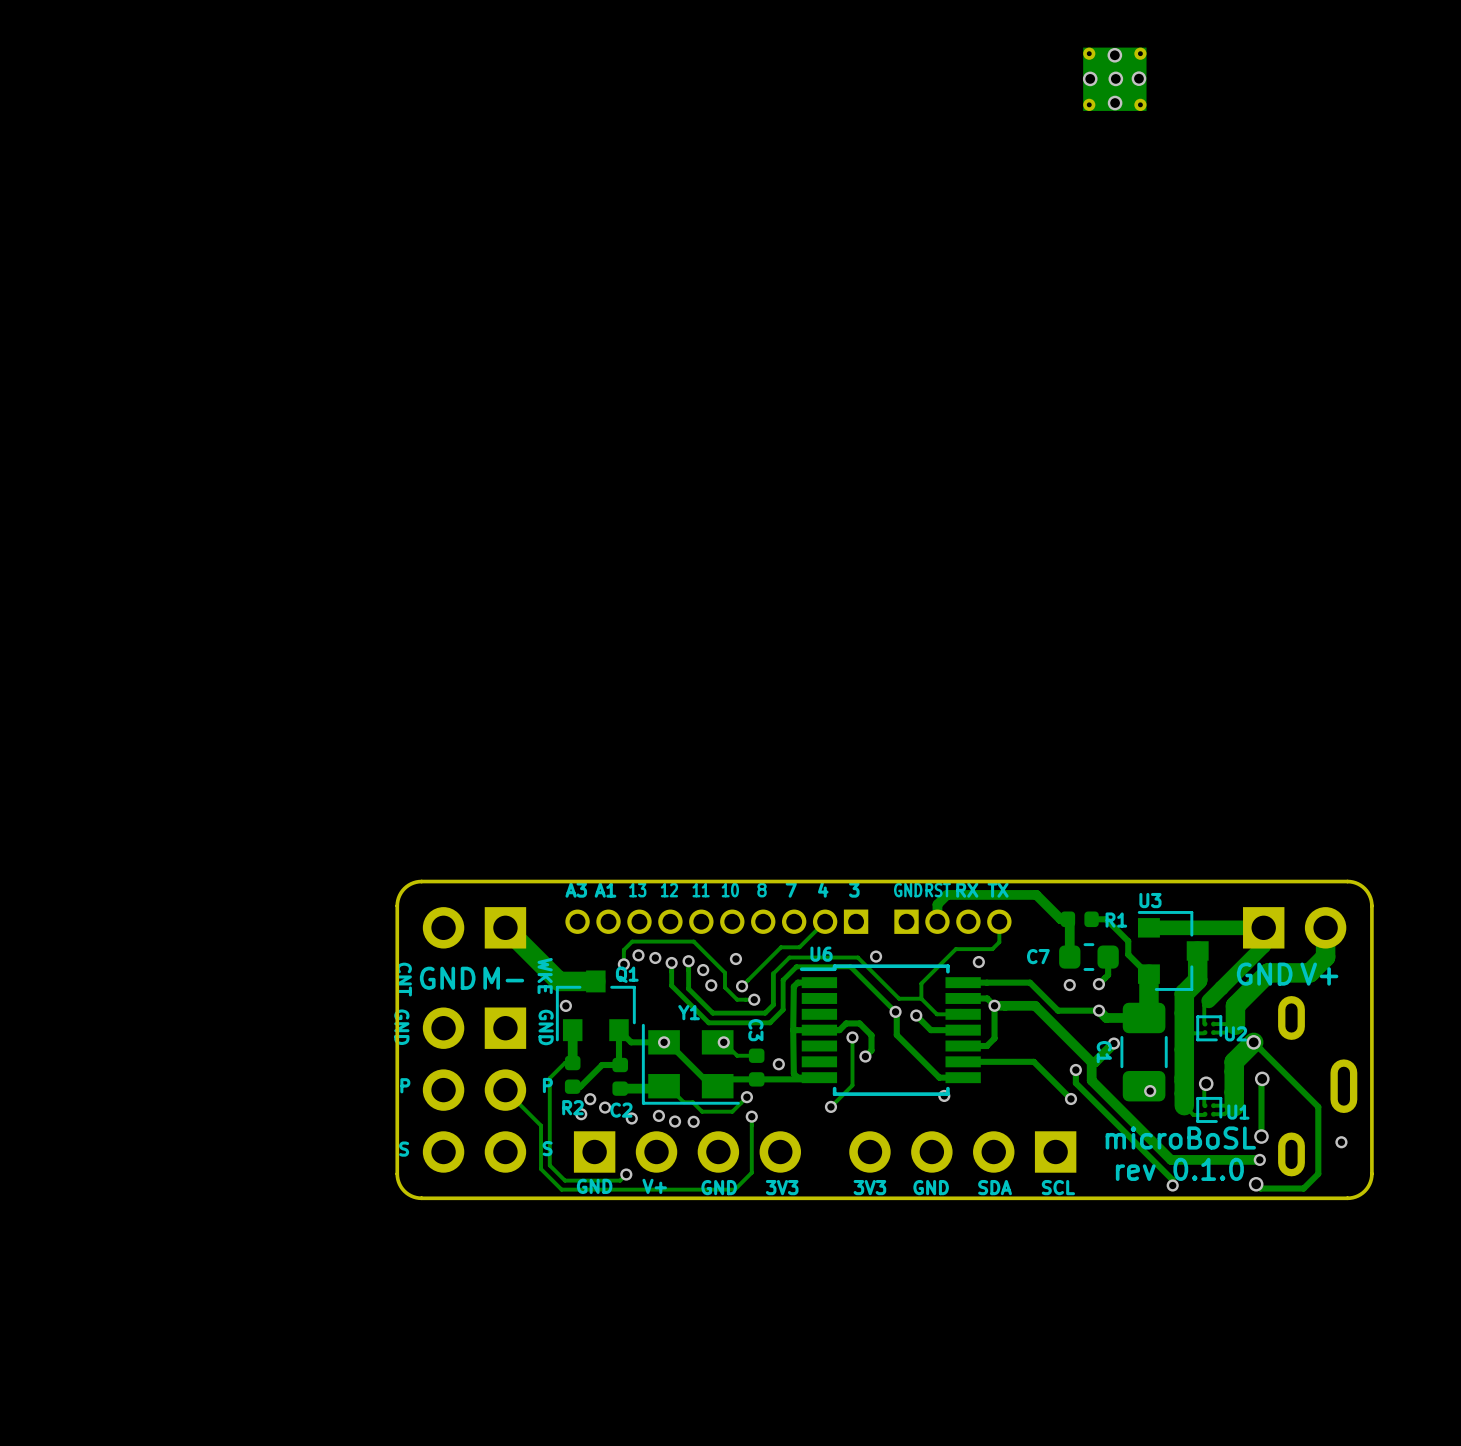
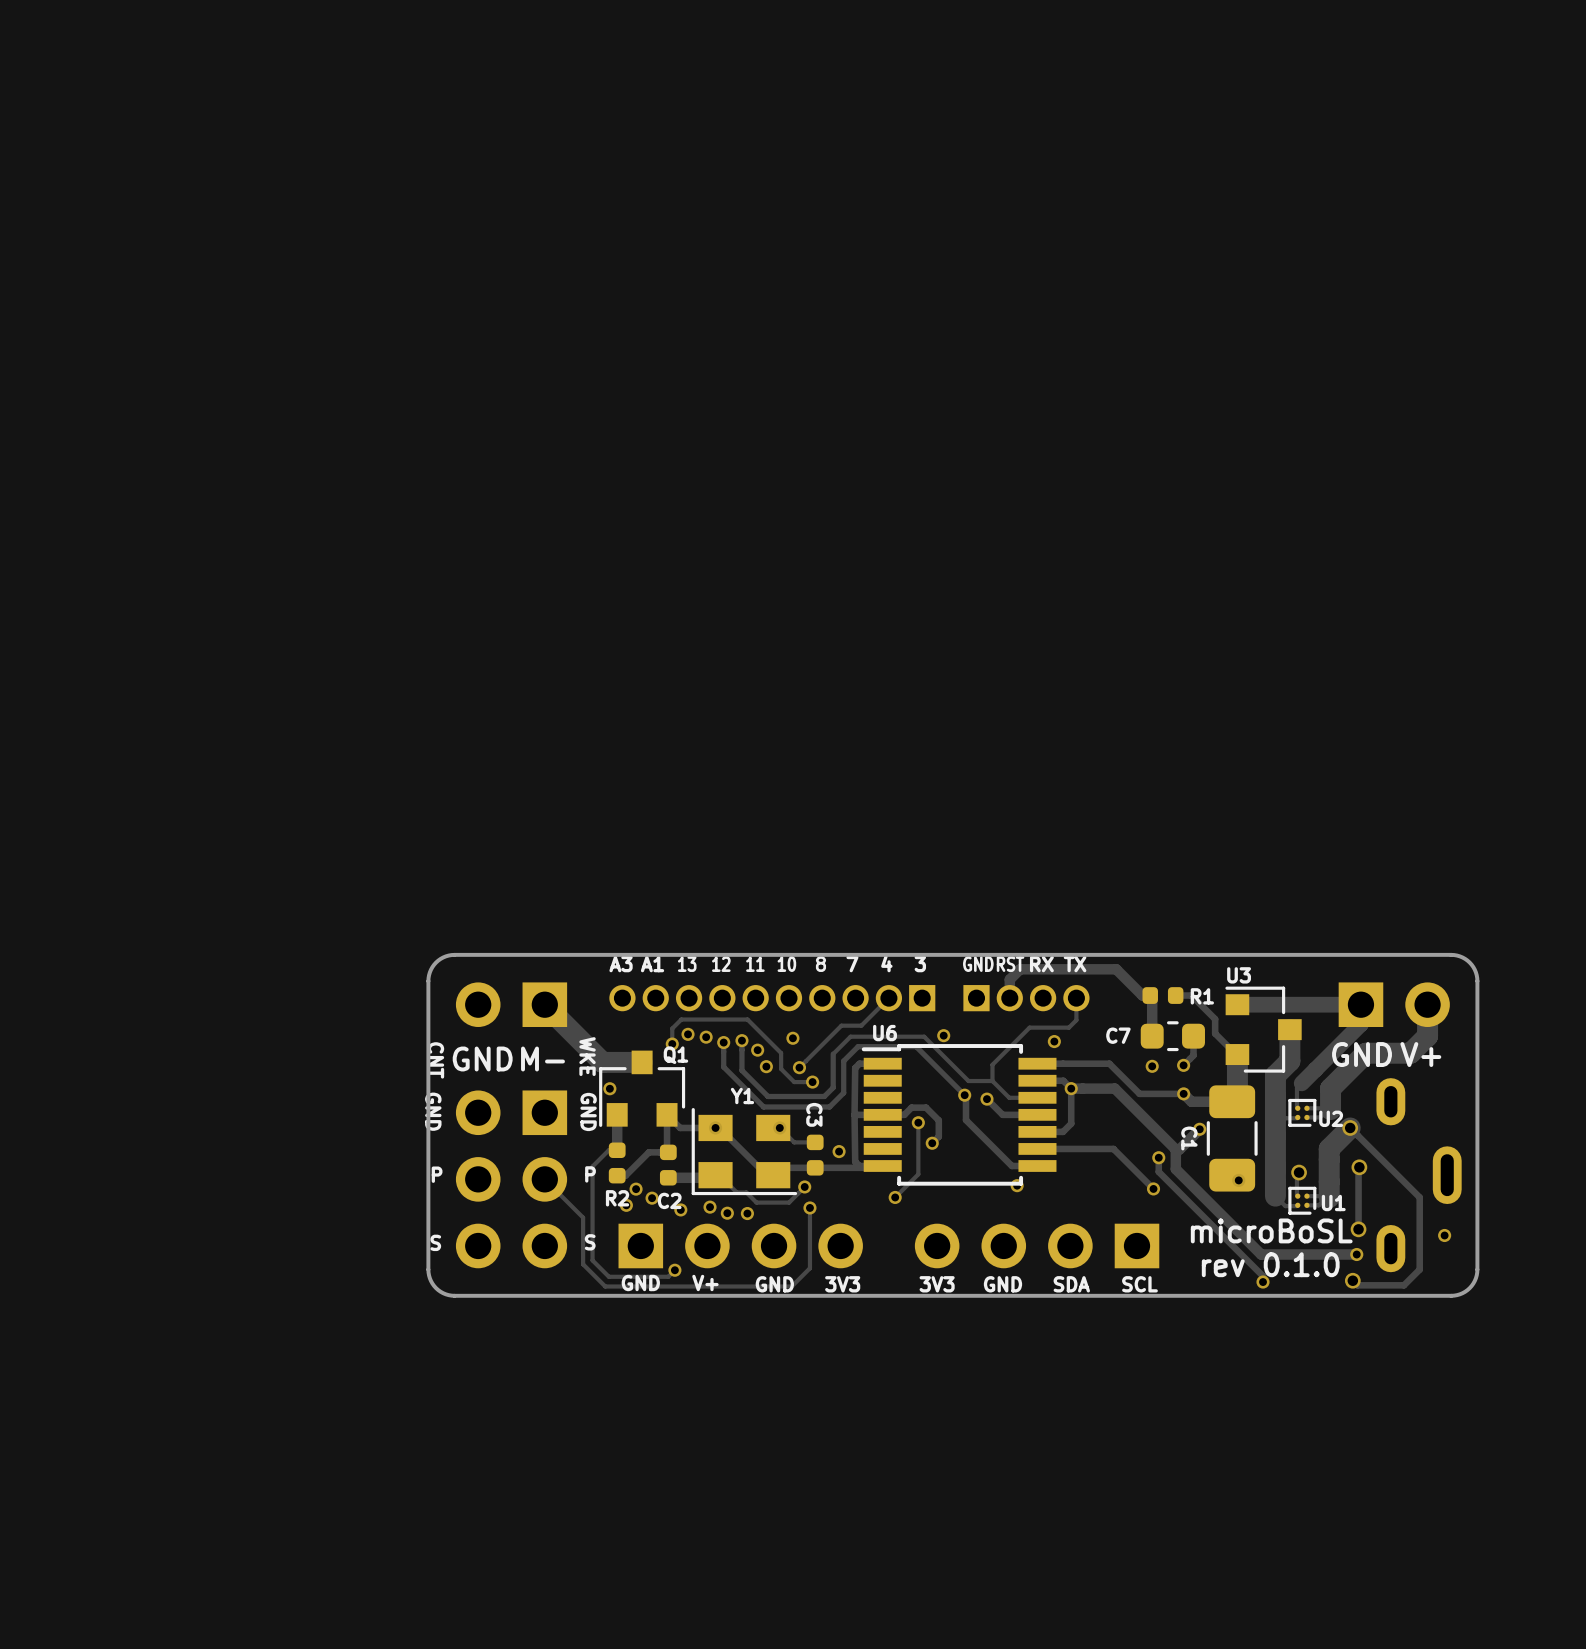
via: (1114, 55) -> none
via: (1090, 78) -> none
via: (1115, 78) -> none
via: (1138, 78) -> none
part: (1114, 79) -> none
via: (1115, 103) -> none

